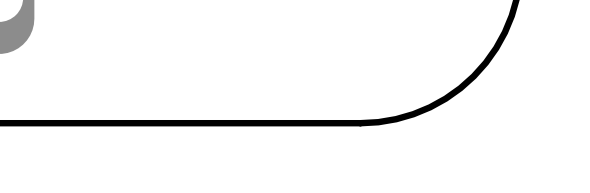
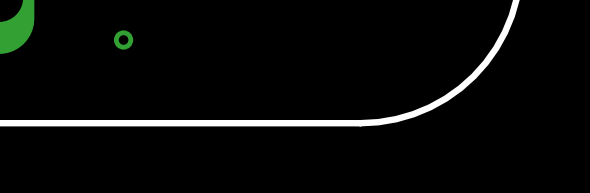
via: none -> (123, 39)

